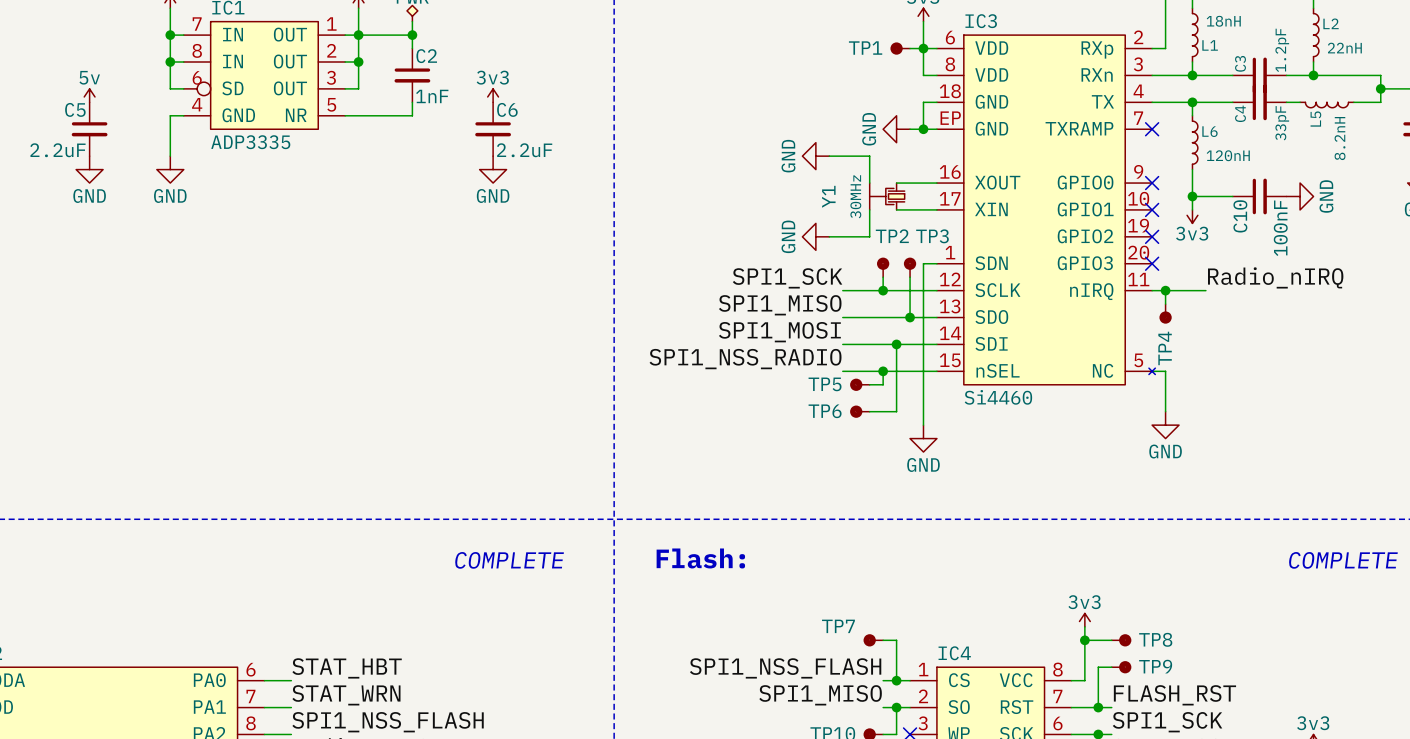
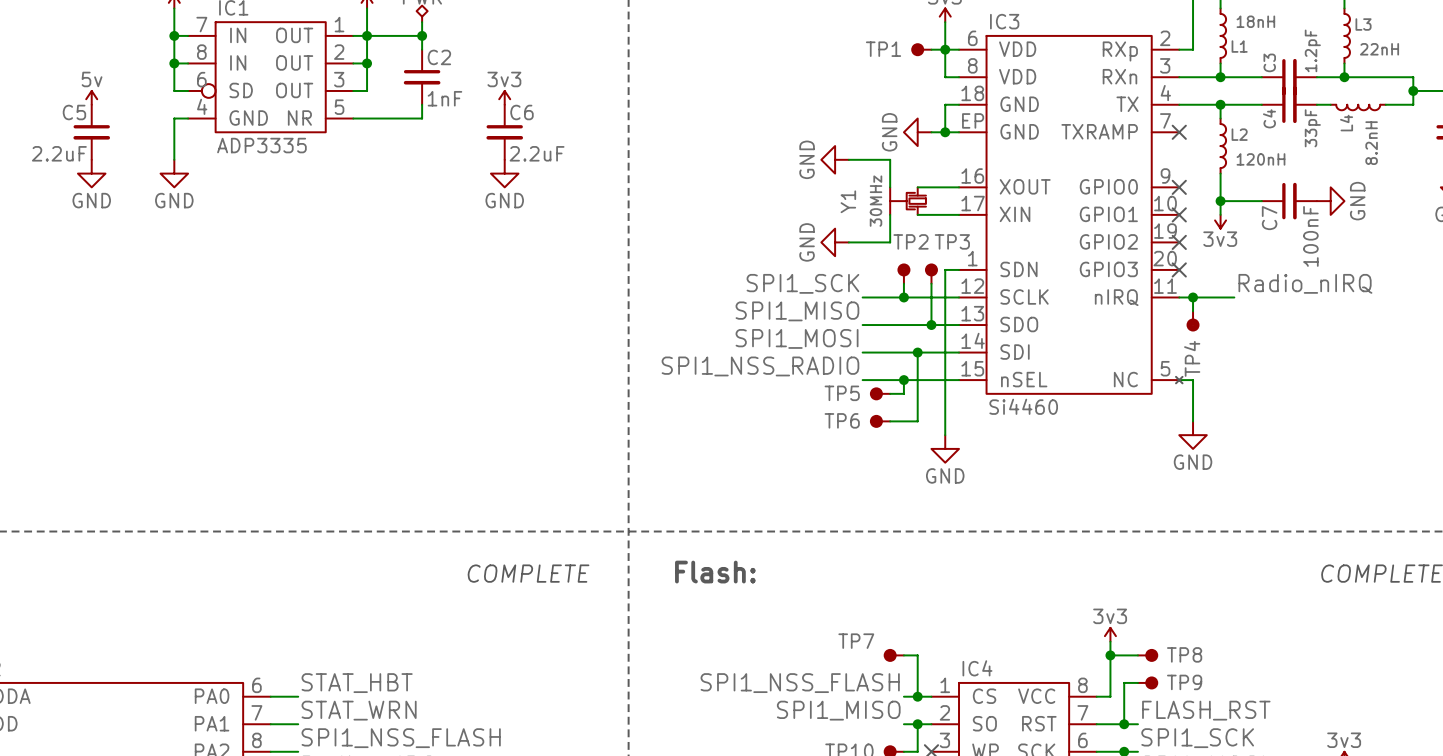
L2 name: L2 (1331, 23) -> L3 (1363, 24)
L5 name: L5 (1315, 119) -> L4 (1346, 123)
L6 name: L6 (1209, 131) -> L2 (1239, 134)
C10 name: C10 (1240, 216) -> C7 (1269, 218)

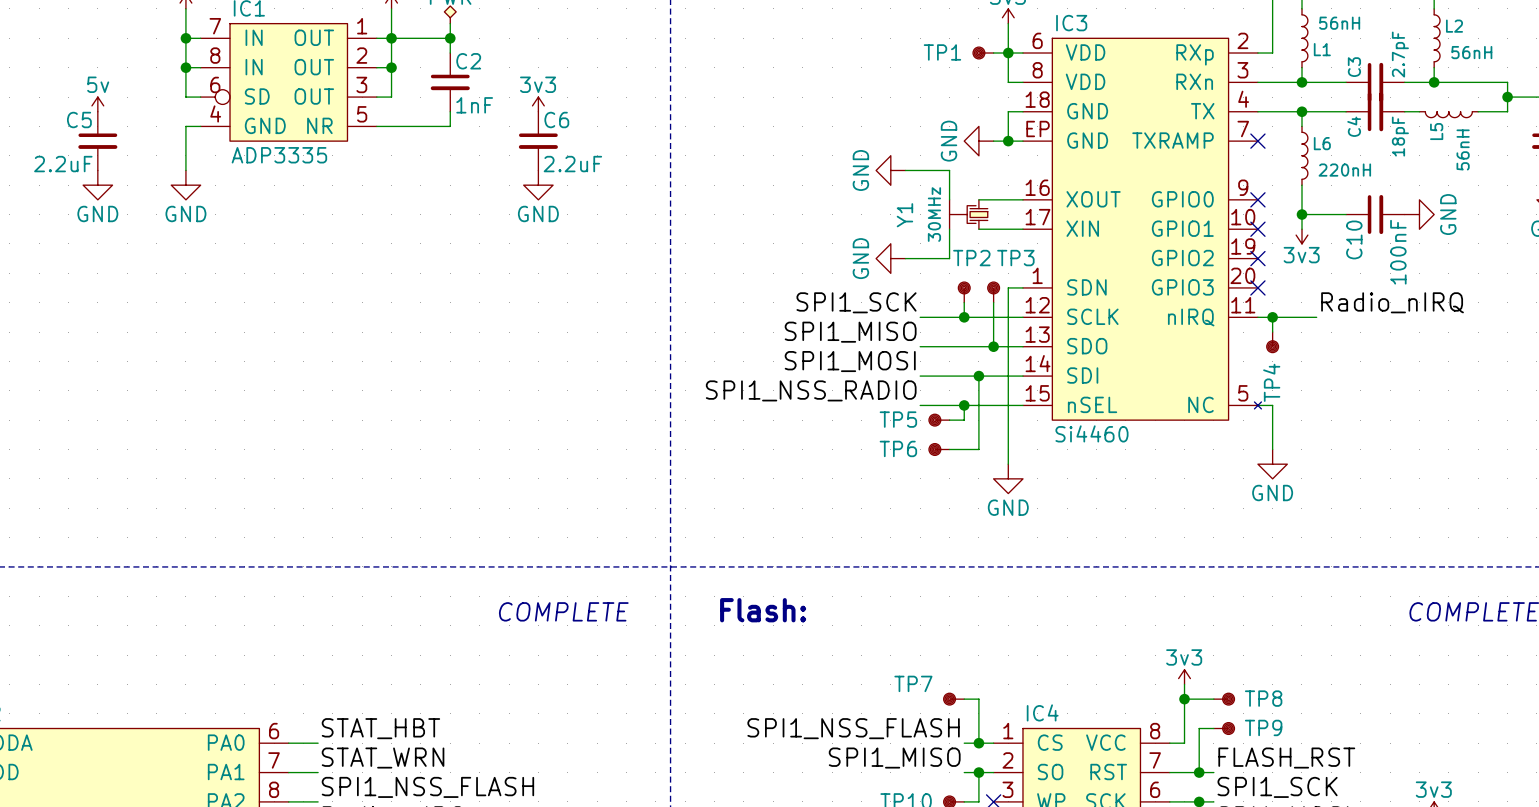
L1 value: 18nH (1255, 21) -> 56nH (1339, 23)
L3 name: L3 (1363, 24) -> L2 (1454, 26)
L3 value: 22nH (1379, 49) -> 56nH (1471, 52)
C3 value: 1.2pF (1312, 50) -> 2.7pF (1400, 54)
L4 name: L4 (1346, 123) -> L5 (1436, 131)
C4 value: 33pF (1312, 128) -> 18pF (1400, 136)
L2 name: L2 (1239, 134) -> L6 (1322, 143)
L4 value: 8.2nH (1371, 143) -> 56nH (1463, 149)
L2 value: 120nH (1260, 159) -> 220nH (1344, 170)
C7 name: C7 (1269, 218) -> C10 (1354, 239)

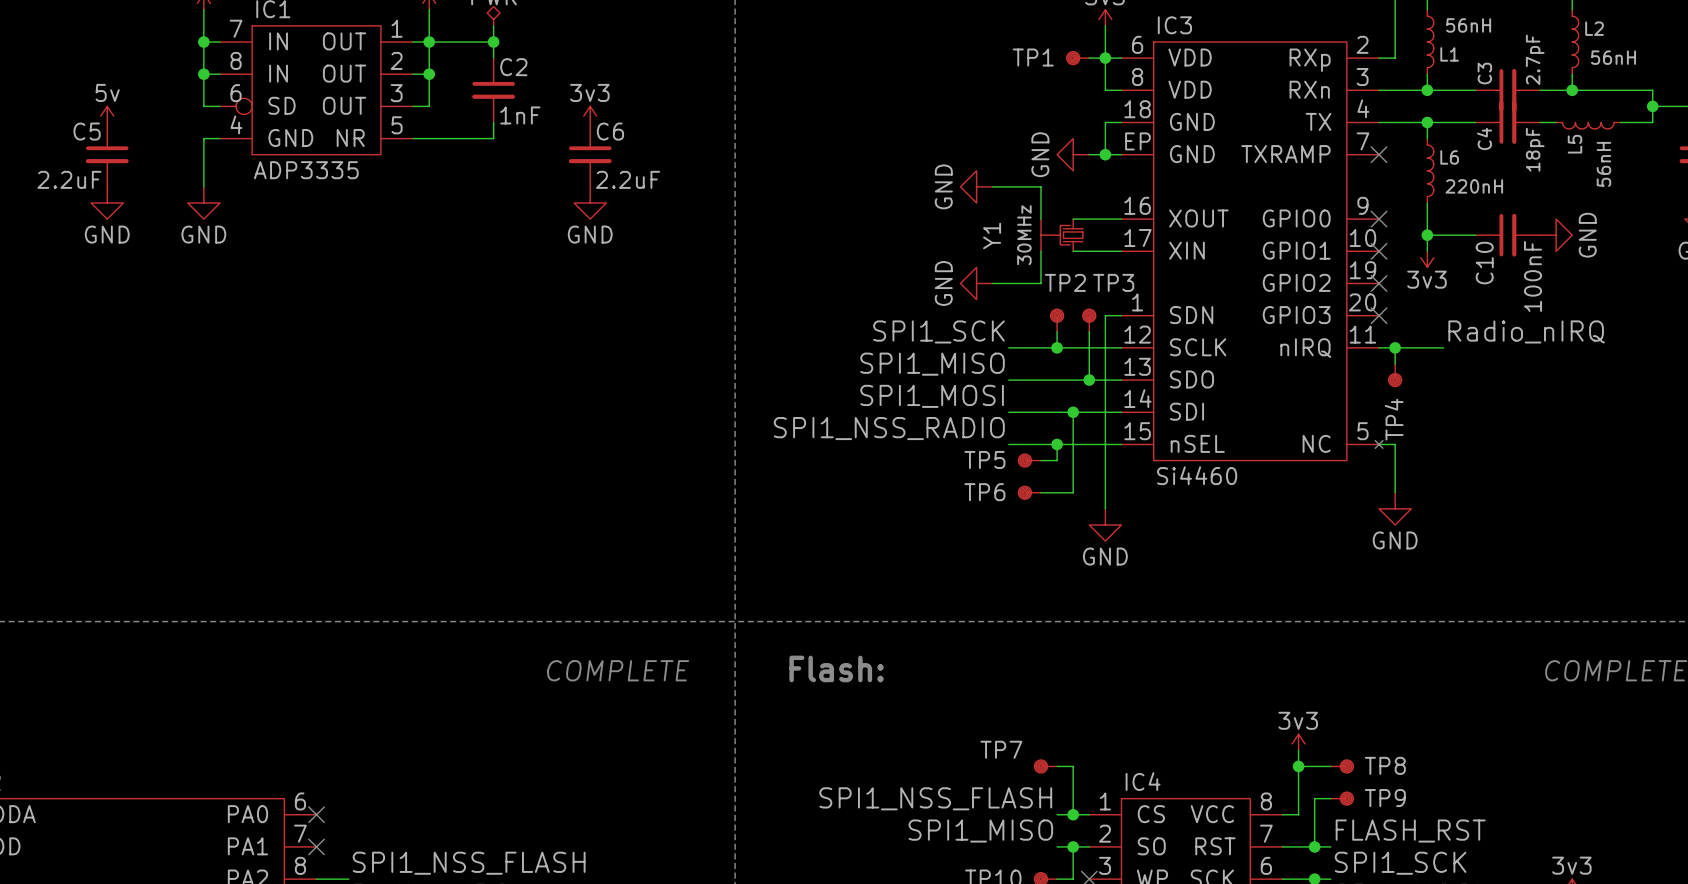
label: STAT_HBT (380, 728) -> none
wire: (288, 743) (318, 743) -> none
no-connect mark: none -> (316, 814)
label: STAT_WRN (383, 758) -> none
wire: (288, 772) (318, 772) -> none
no-connect mark: none -> (316, 846)

